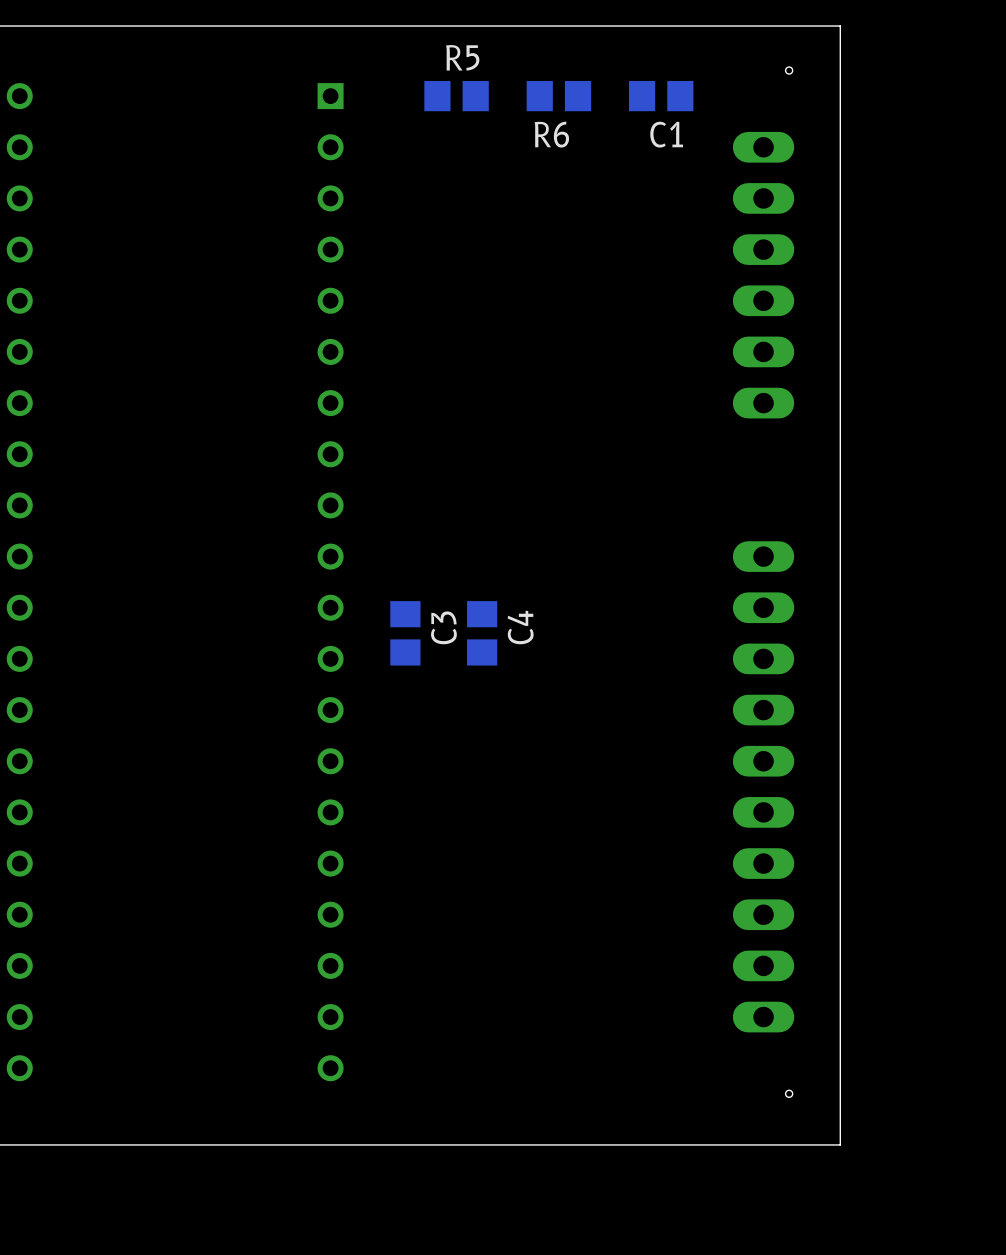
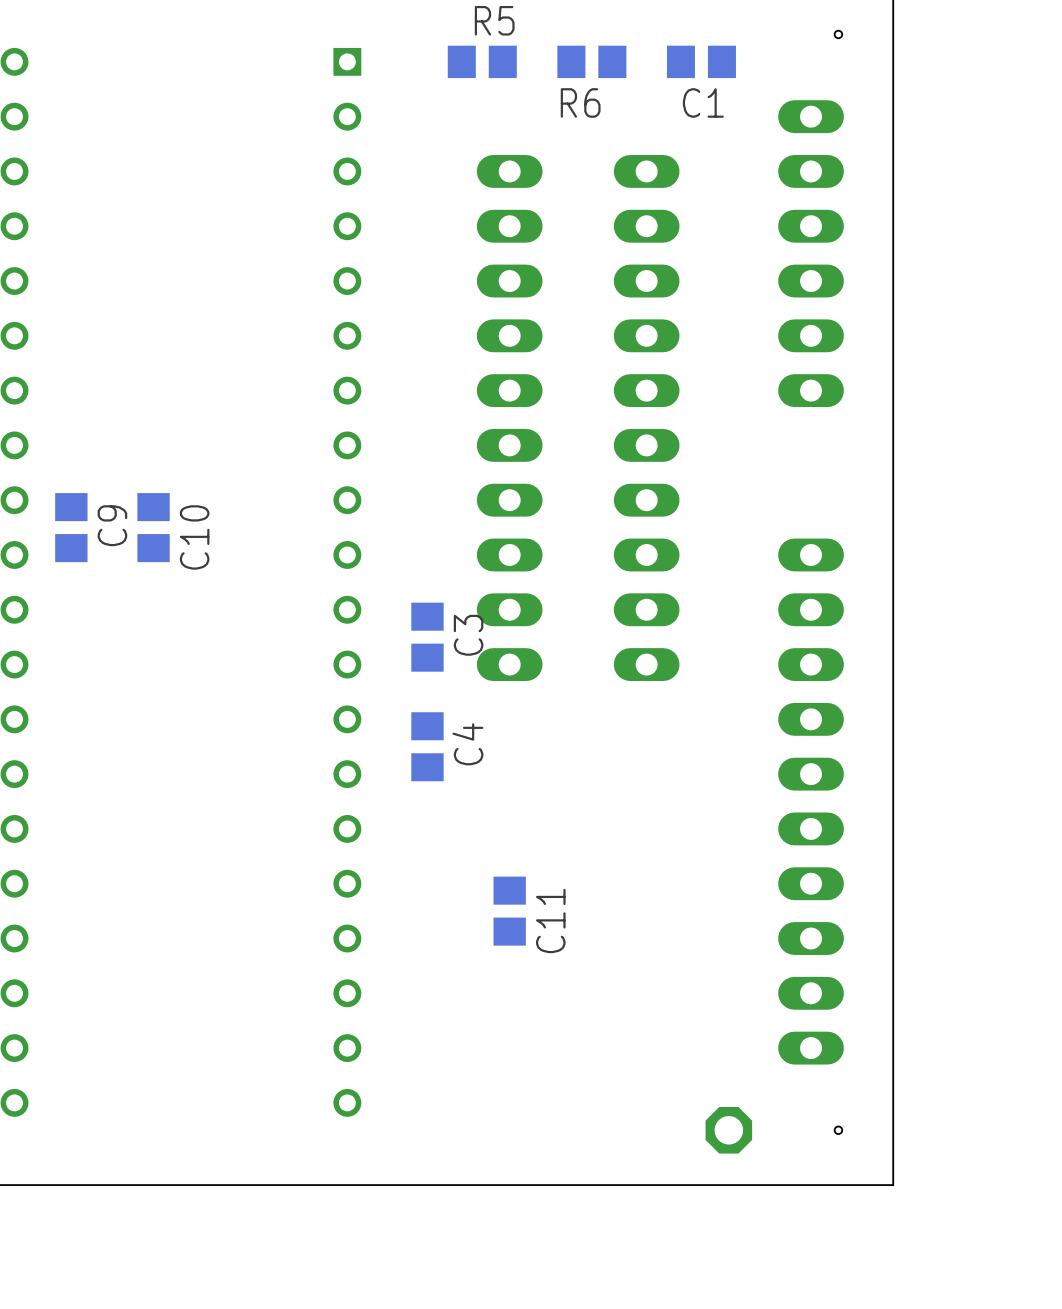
part: none -> (509, 418)
part: none -> (646, 418)
C9: none -> (71, 527)
C10: none -> (153, 527)
C4 position: (482, 633) -> (427, 746)
C11: none -> (509, 911)
part: none -> (728, 1130)

